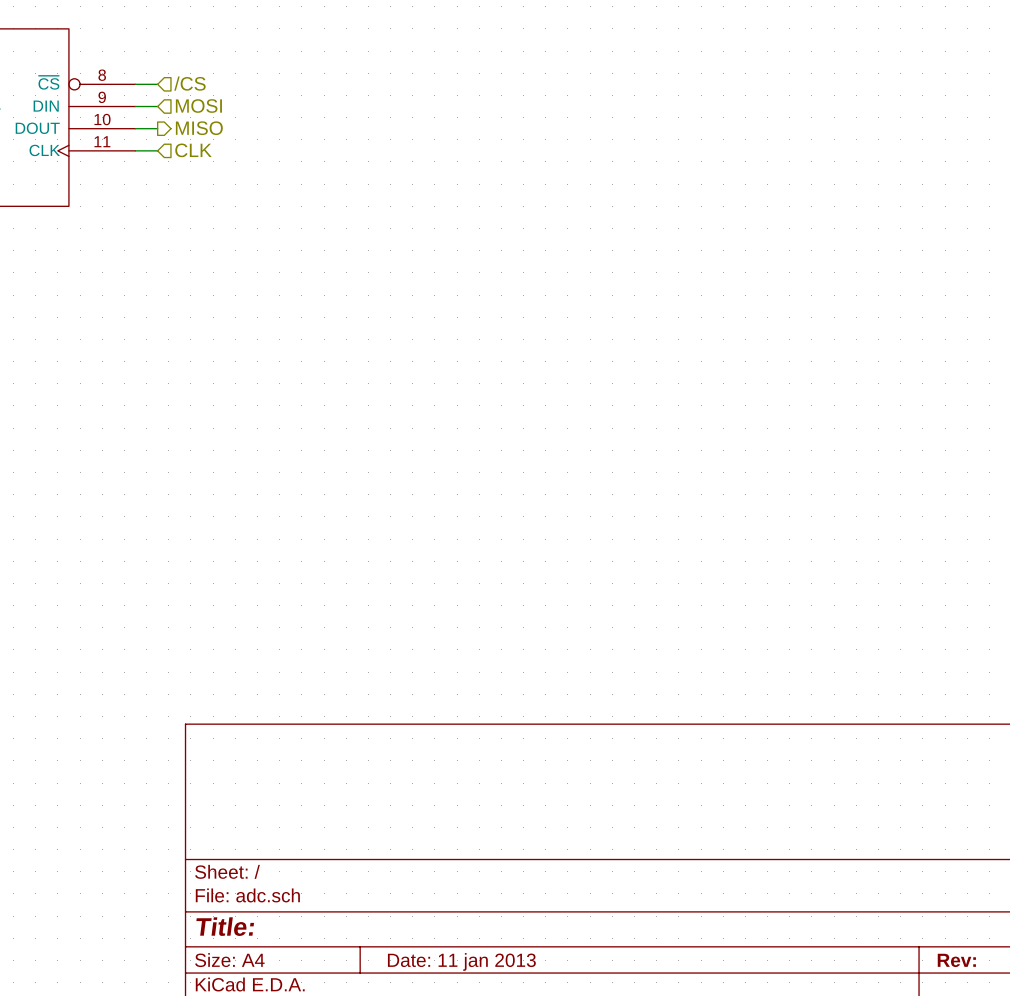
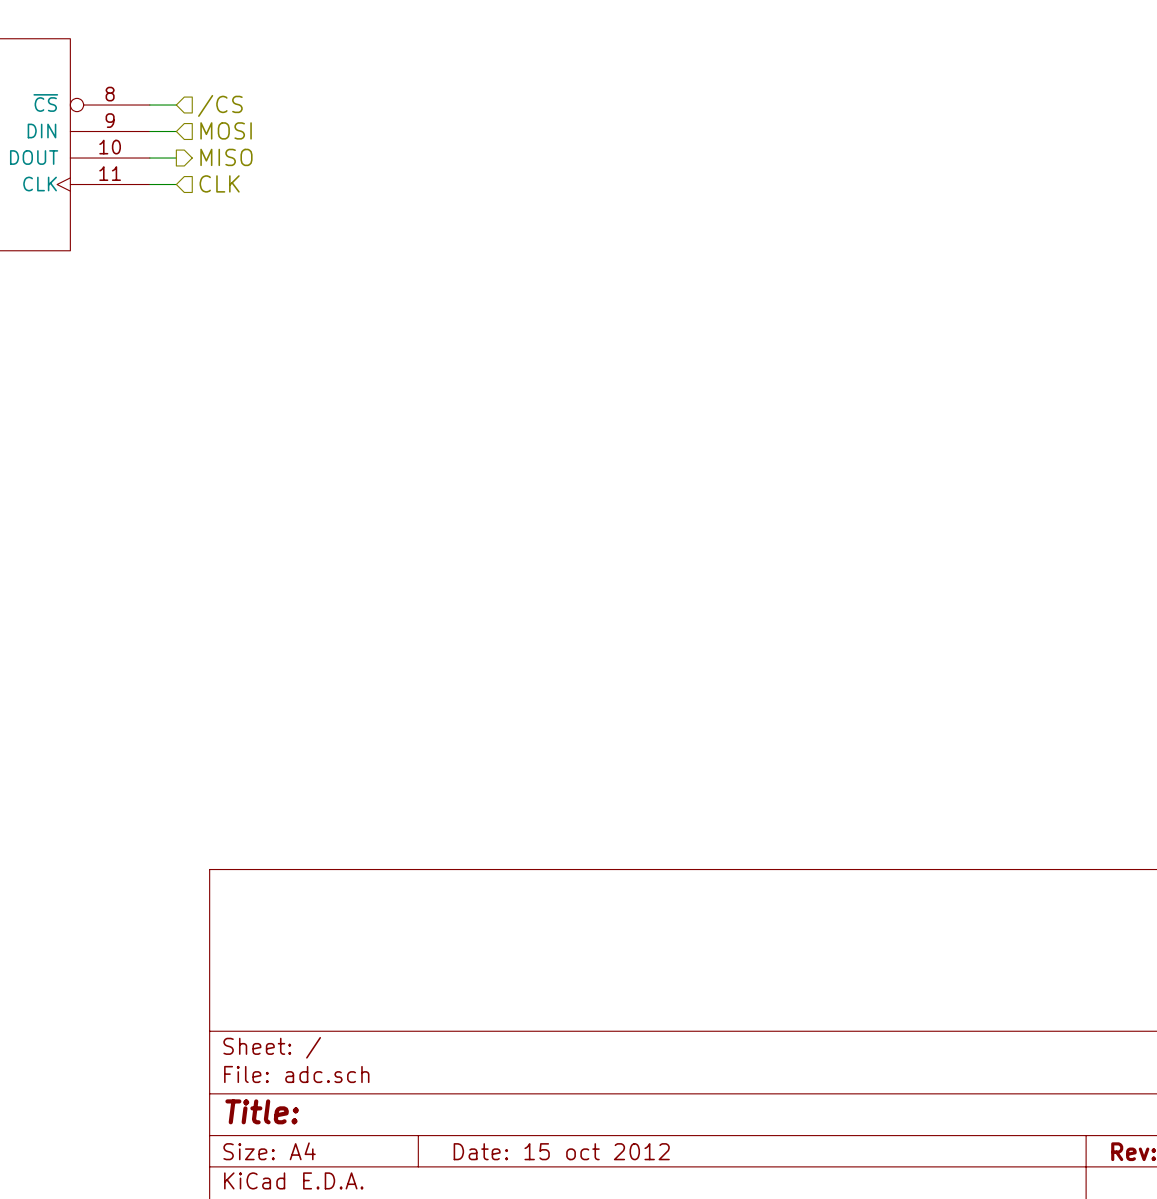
title block: Date: 11 jan 2013 (461, 961) -> Date: 15 oct 2012 (561, 1151)

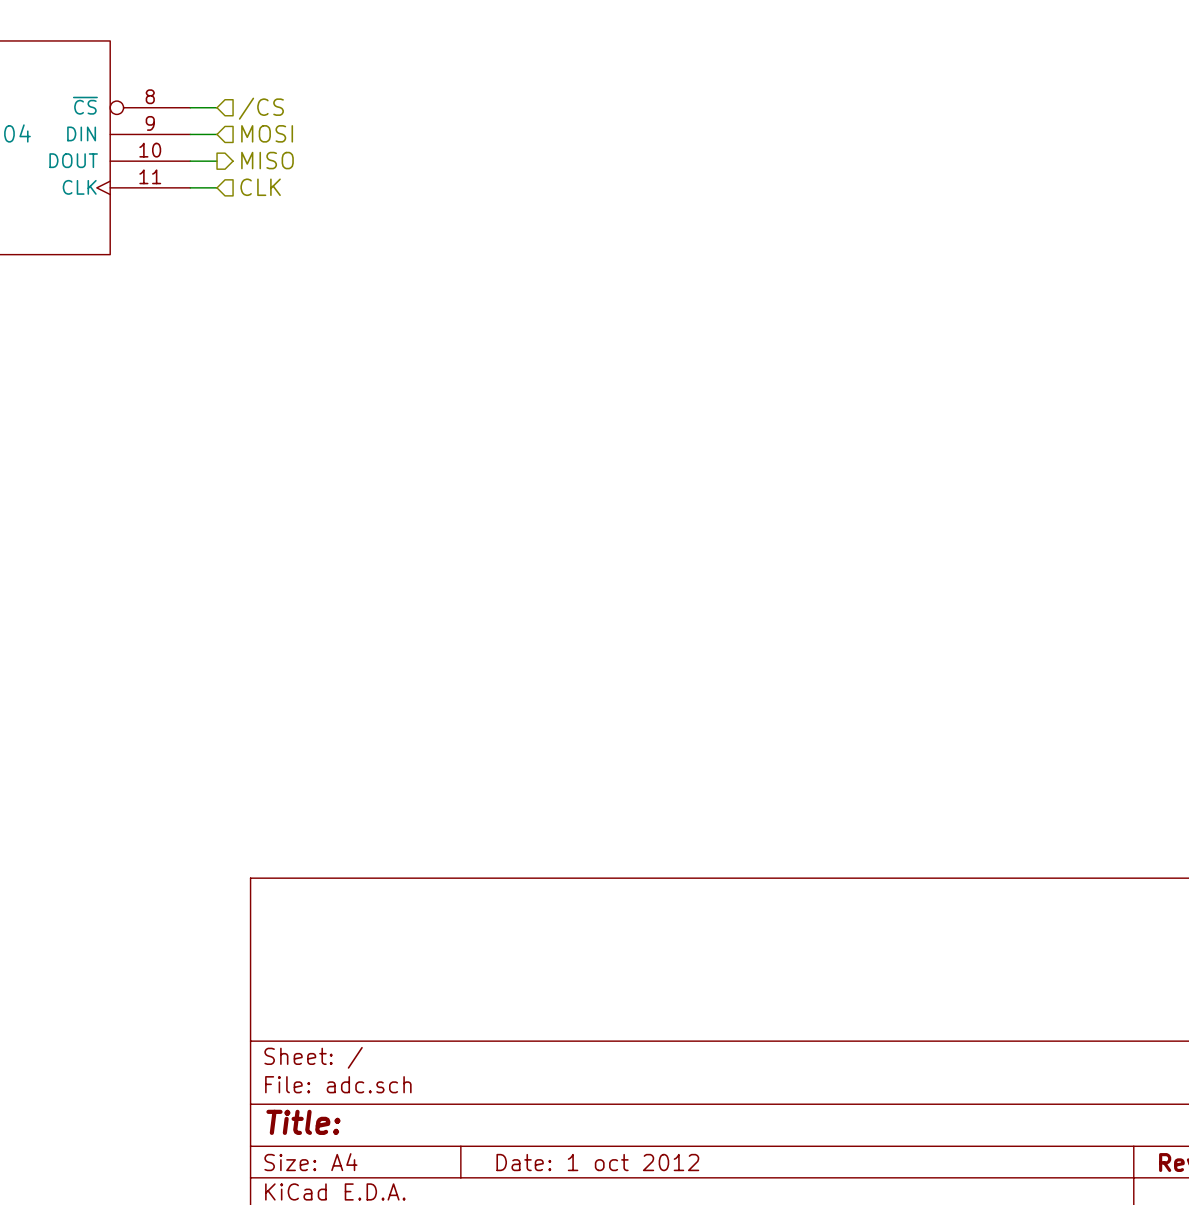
title block: Date: 15 oct 2012 (561, 1151) -> Date: 1 oct 2012 (597, 1162)

